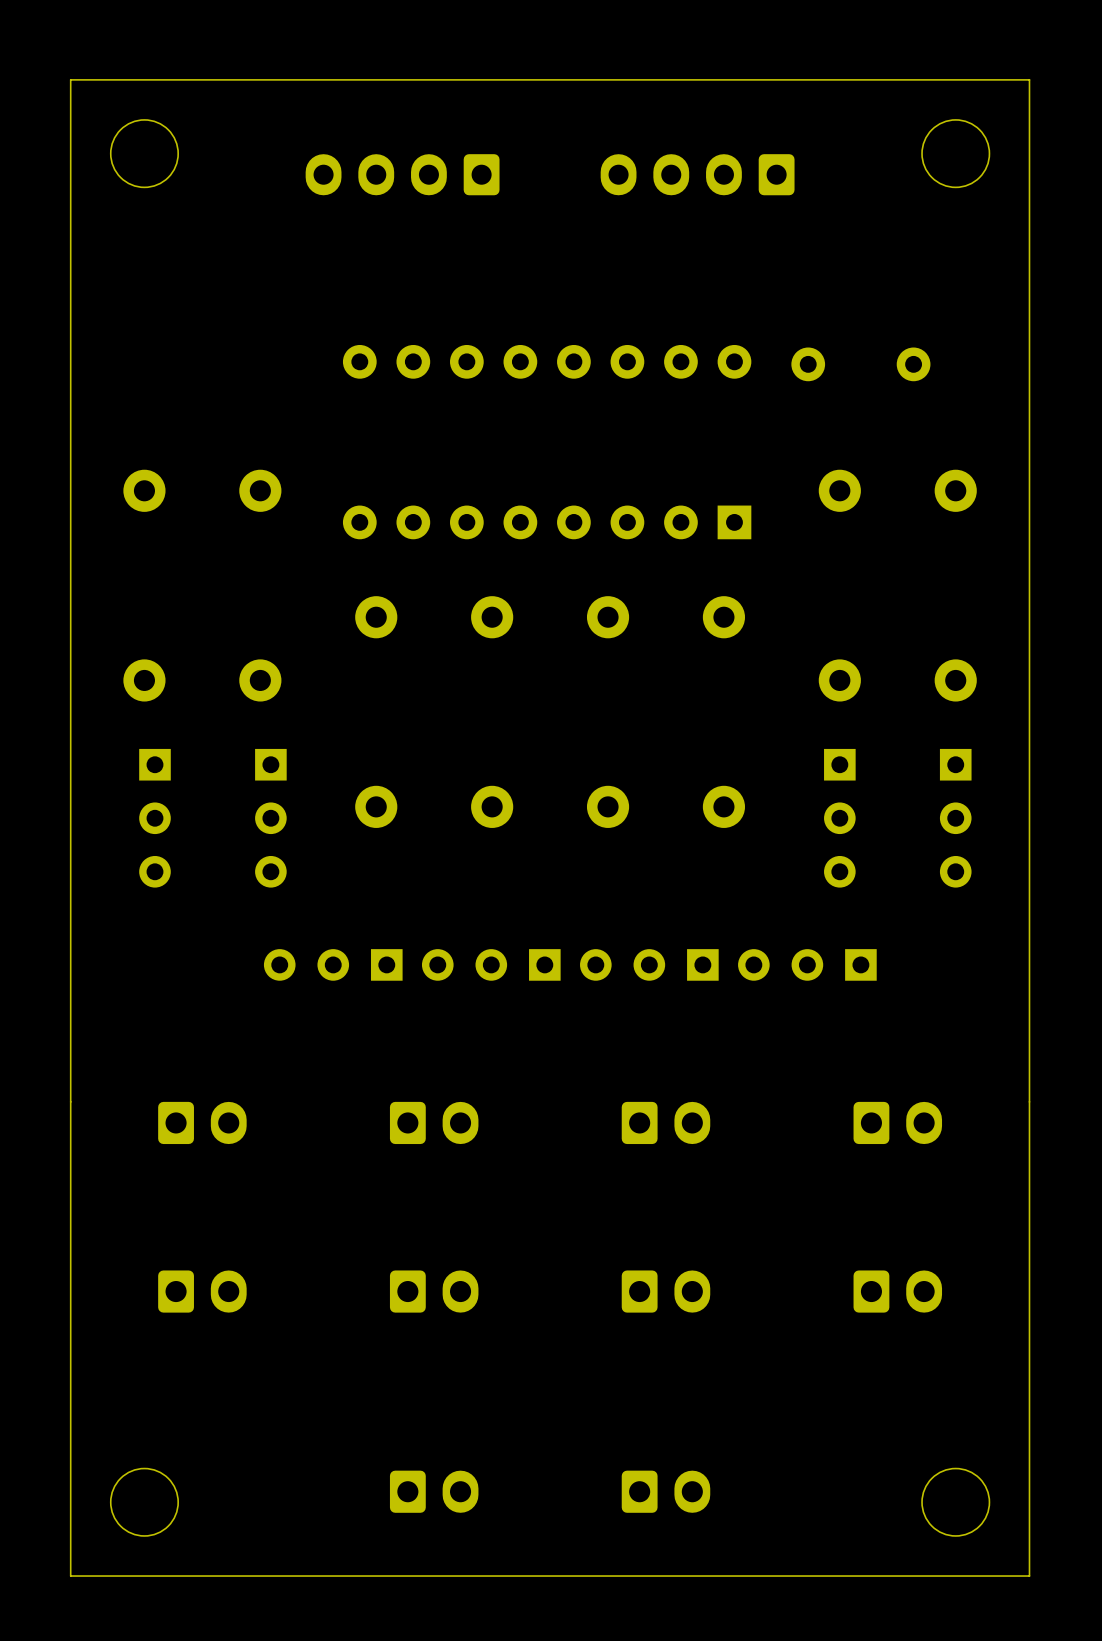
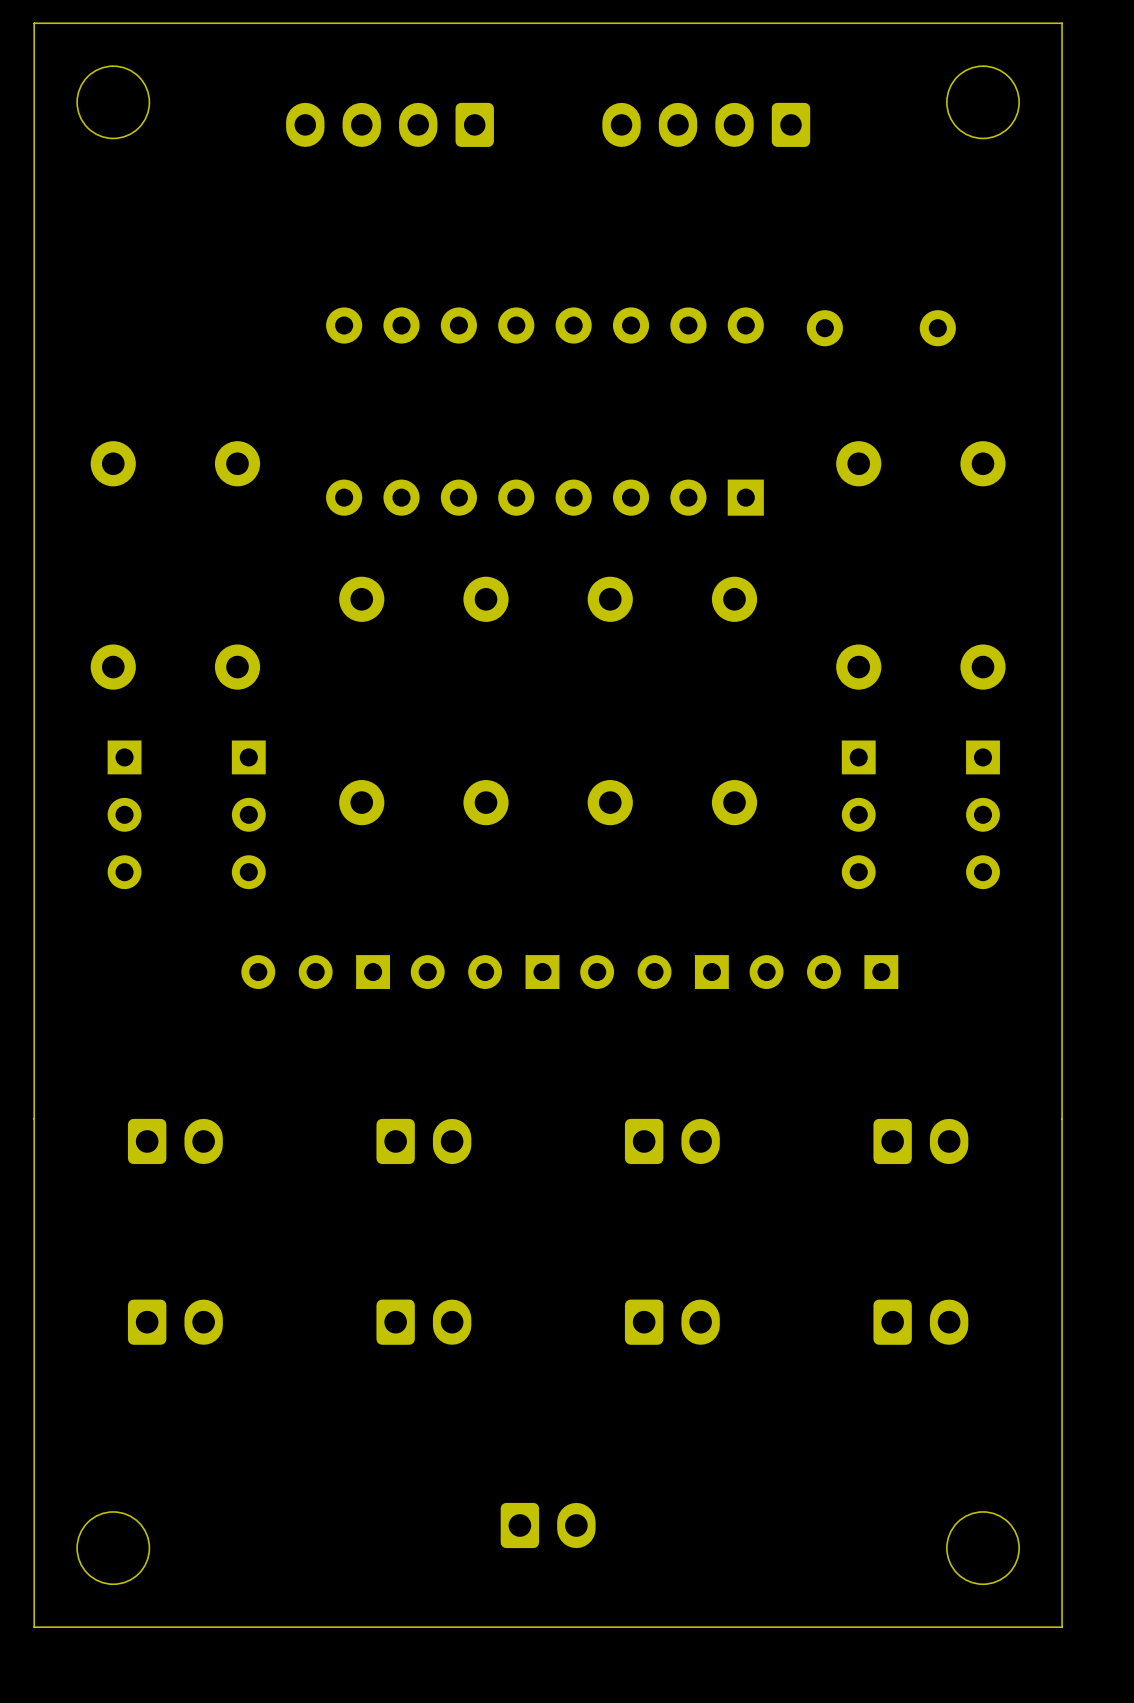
part: none -> (548, 1525)
part: (434, 1491) -> none
part: (665, 1491) -> none

